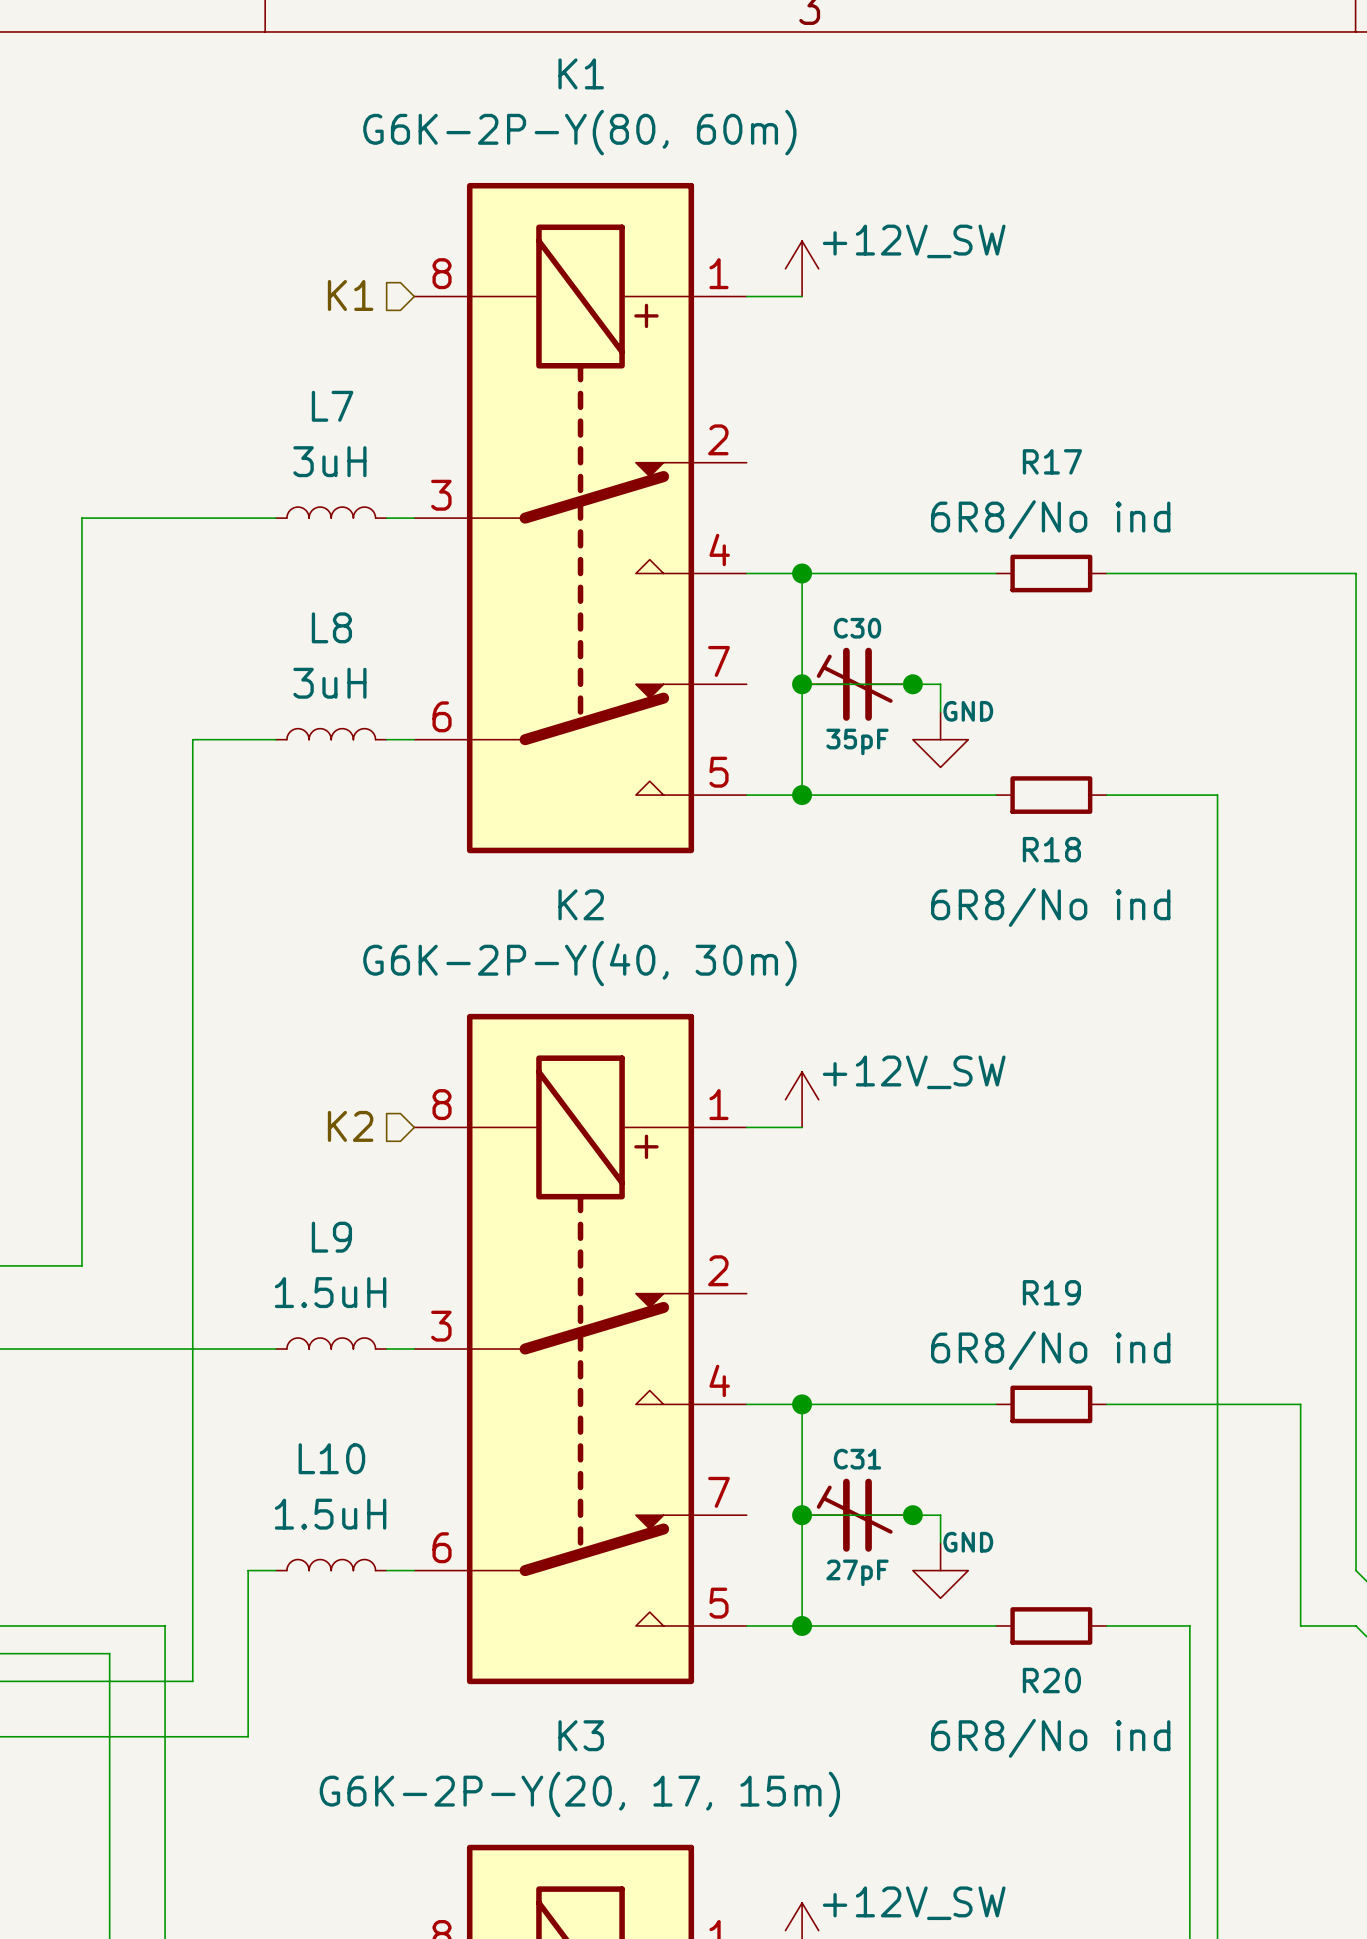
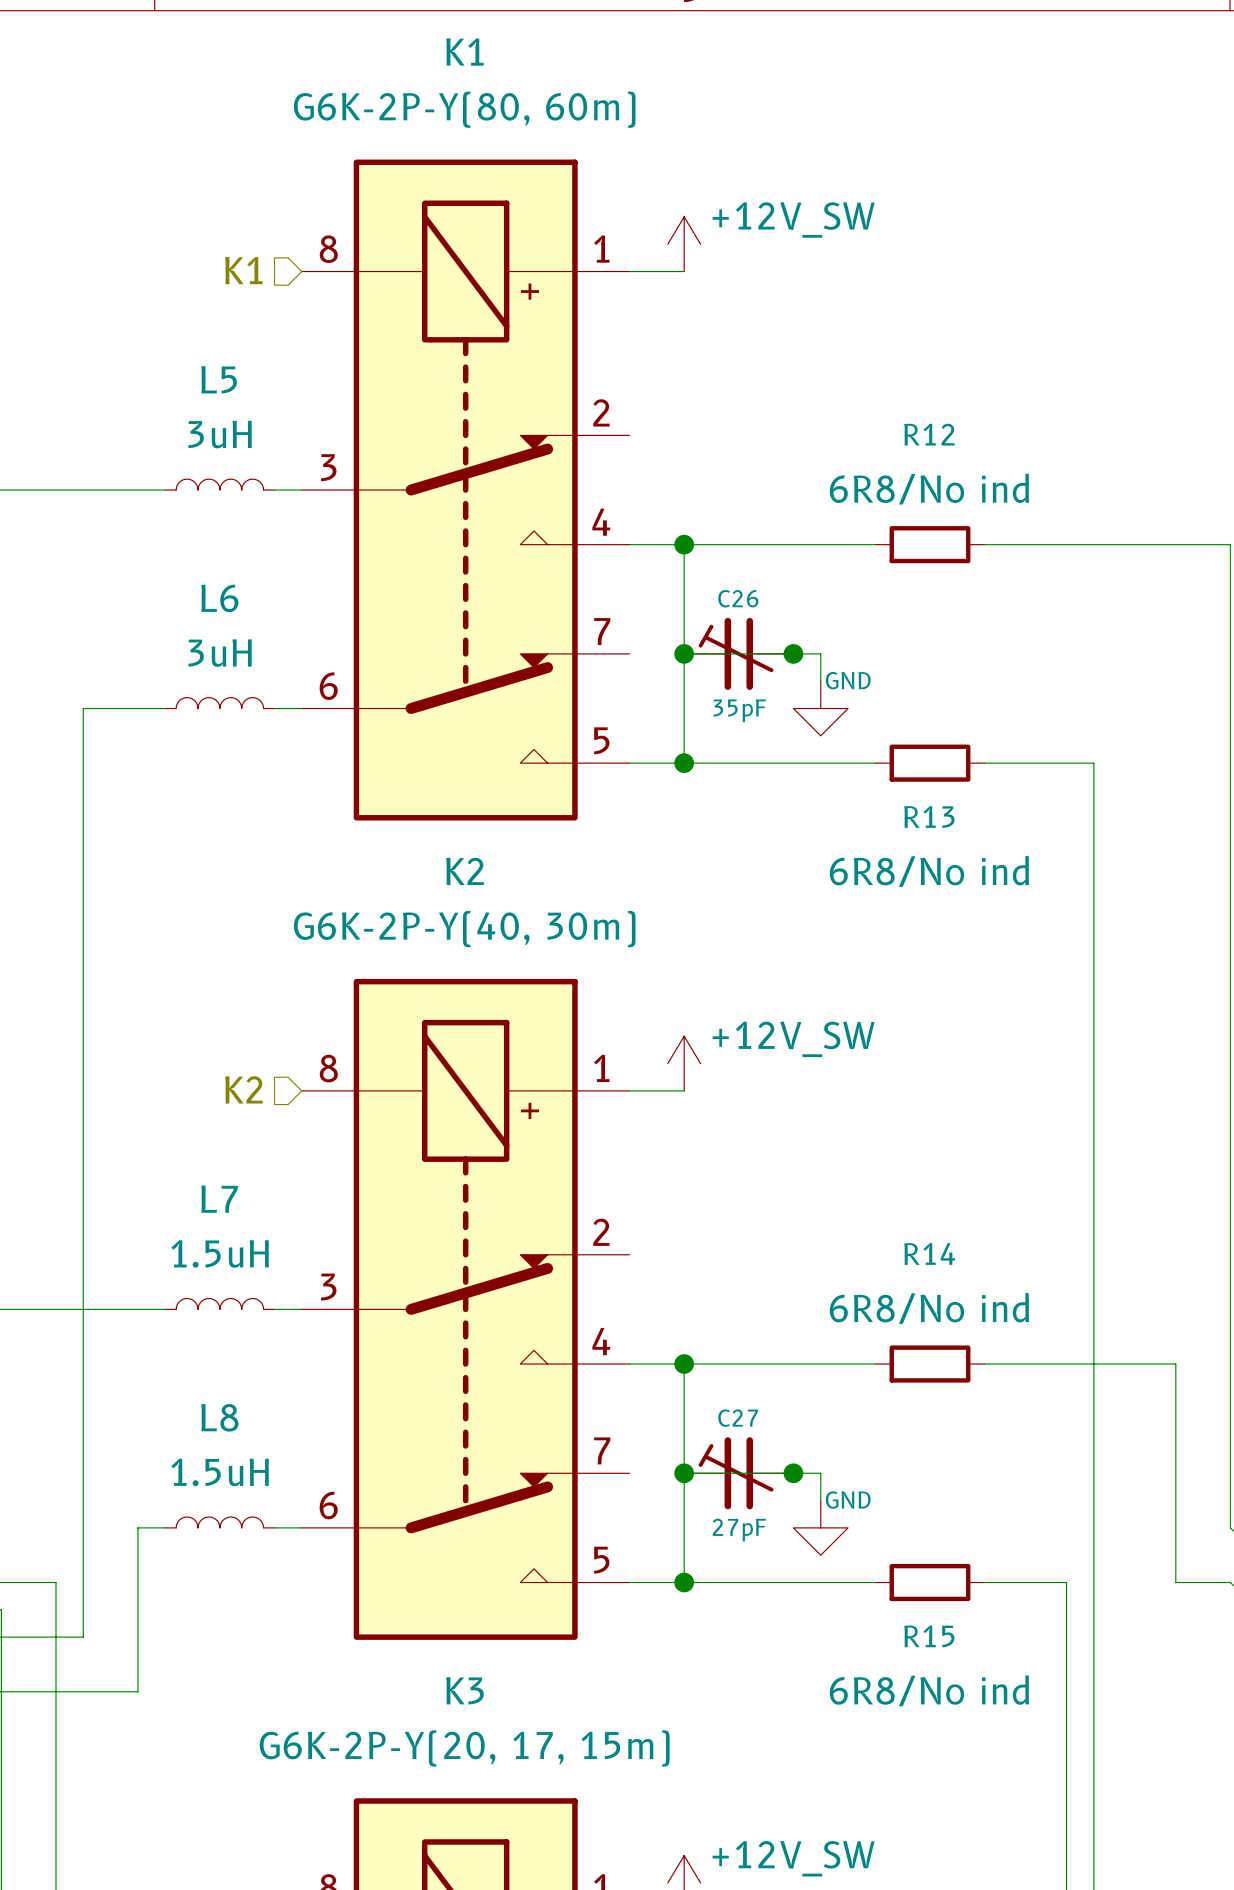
L7 name: L7 (332, 406) -> L5 (219, 379)
R17 name: R17 (1052, 461) -> R12 (929, 434)
L8 name: L8 (331, 627) -> L6 (219, 598)
C30 name: C30 (857, 628) -> C26 (738, 598)
R18 name: R18 (1051, 849) -> R13 (929, 816)
L9 name: L9 (331, 1237) -> L7 (219, 1199)
R19 name: R19 (1051, 1292) -> R14 (929, 1253)
L10 name: L10 (331, 1458) -> L8 (219, 1417)
C31 name: C31 (857, 1459) -> C27 (738, 1418)
R20 name: R20 (1051, 1680) -> R15 (929, 1636)

